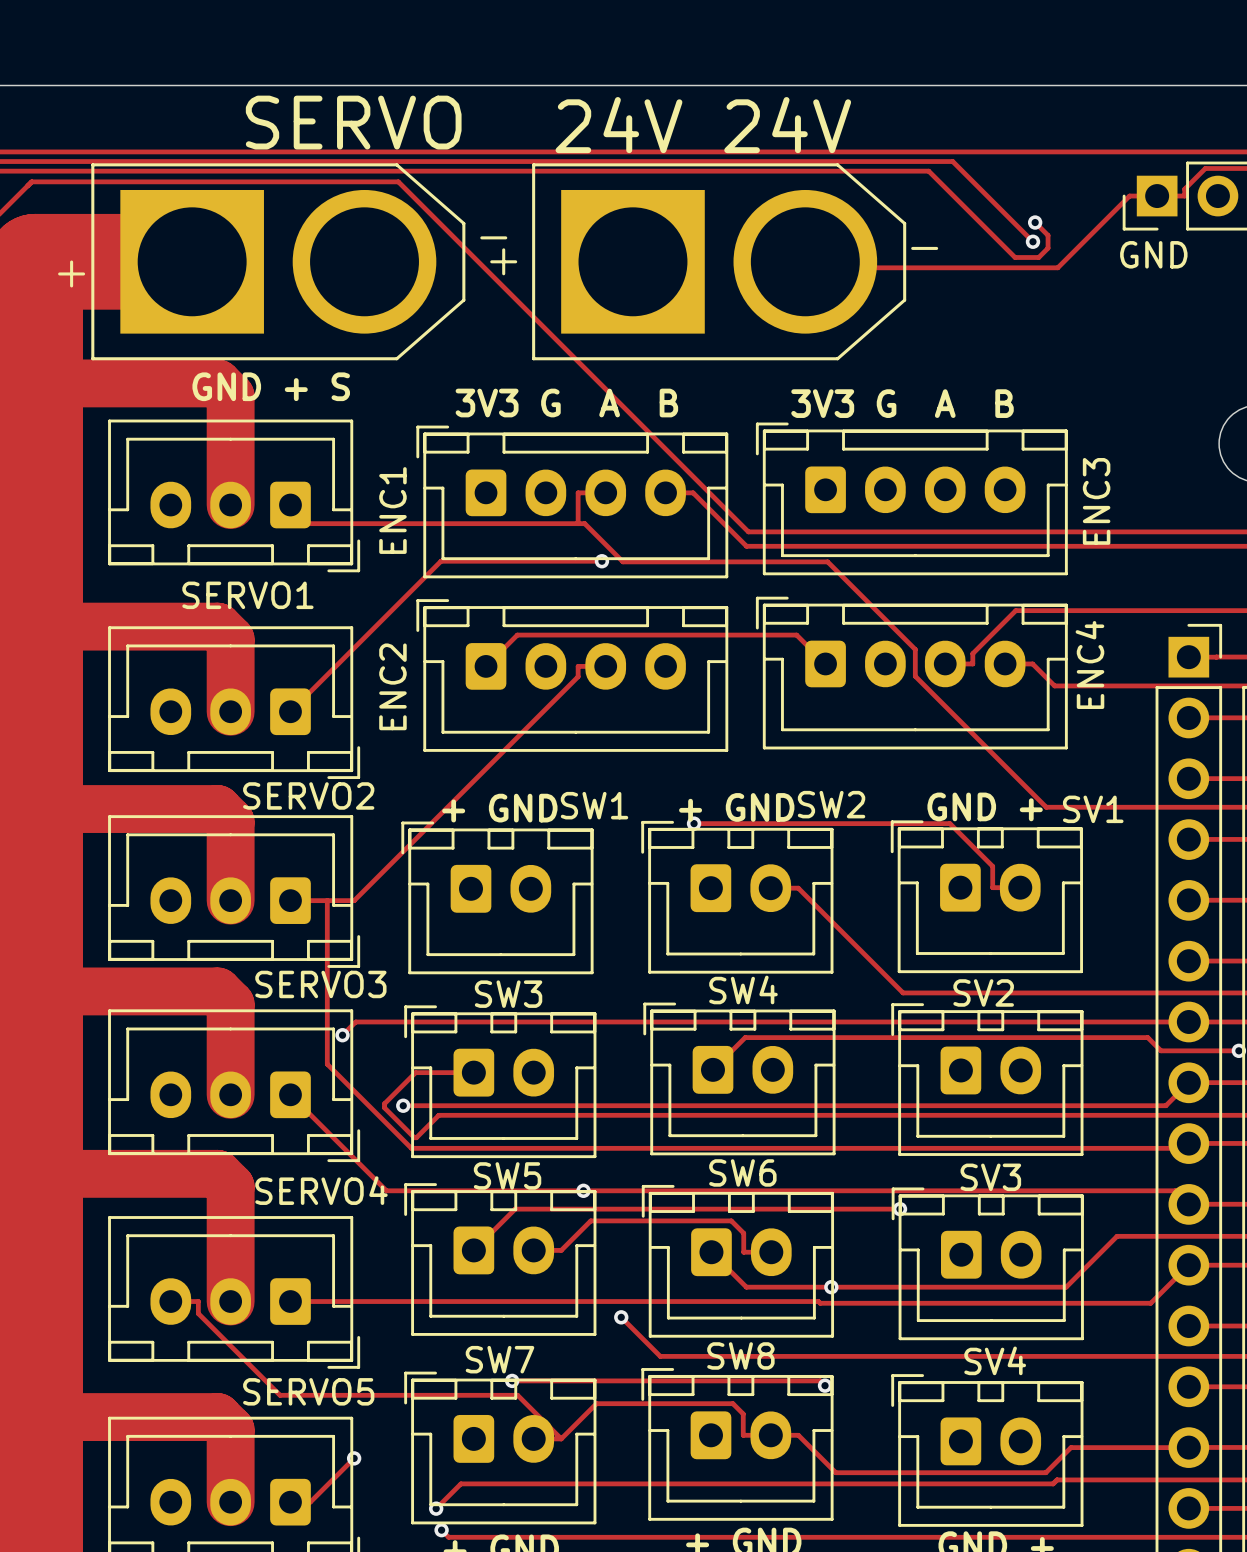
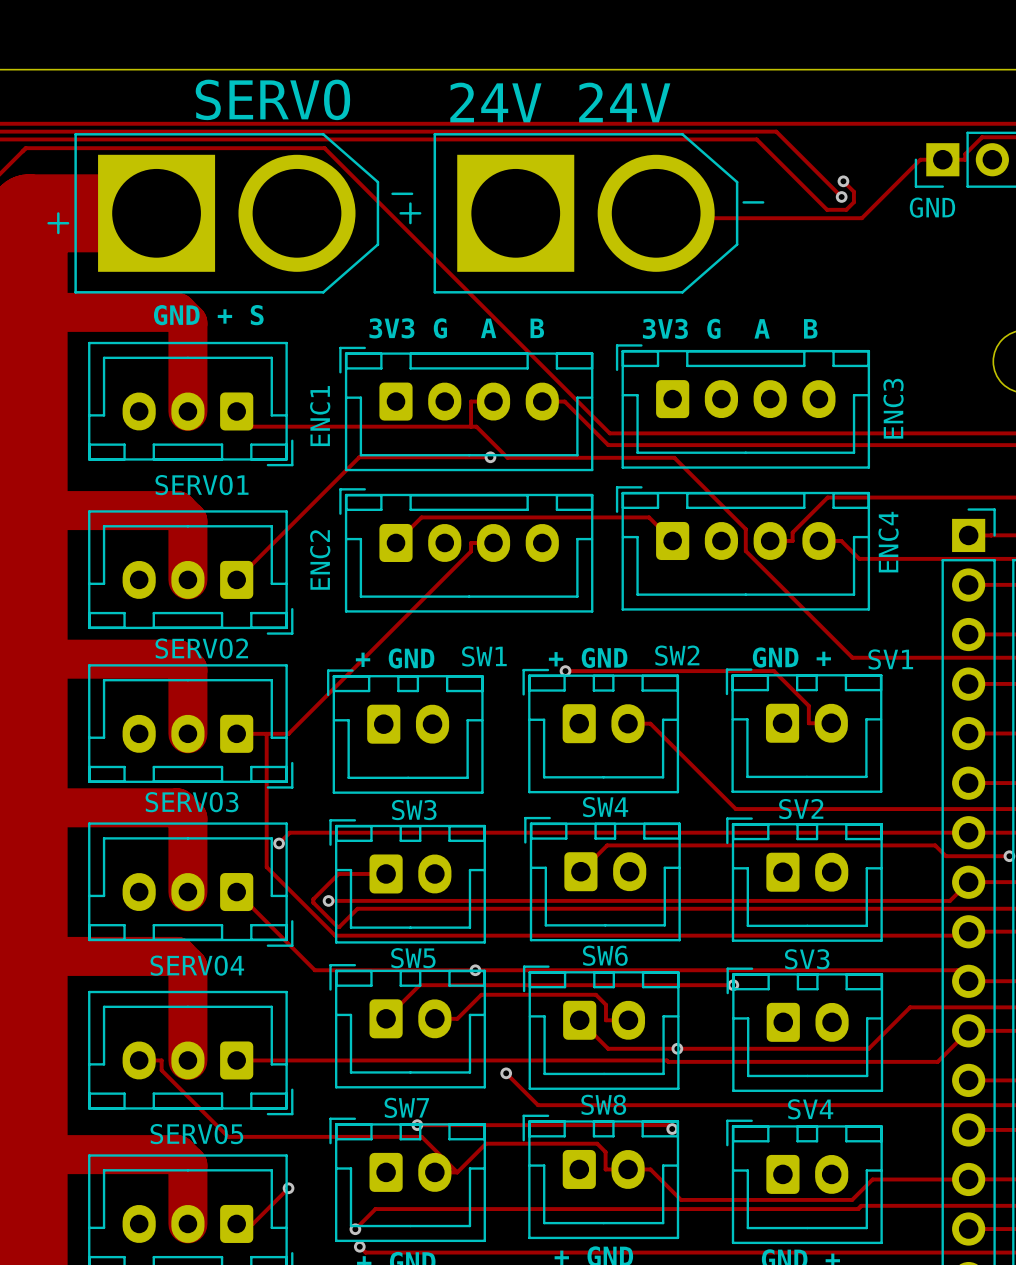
SERVO2 name position: SERVO2 (308, 795) -> SERVO2 (201, 648)
SERVO3 name position: SERVO3 (320, 984) -> SERVO3 (192, 802)
SERVO4 name position: SERVO4 (321, 1190) -> SERVO4 (197, 965)
SERVO5 name position: SERVO5 (308, 1391) -> SERVO5 (196, 1134)

